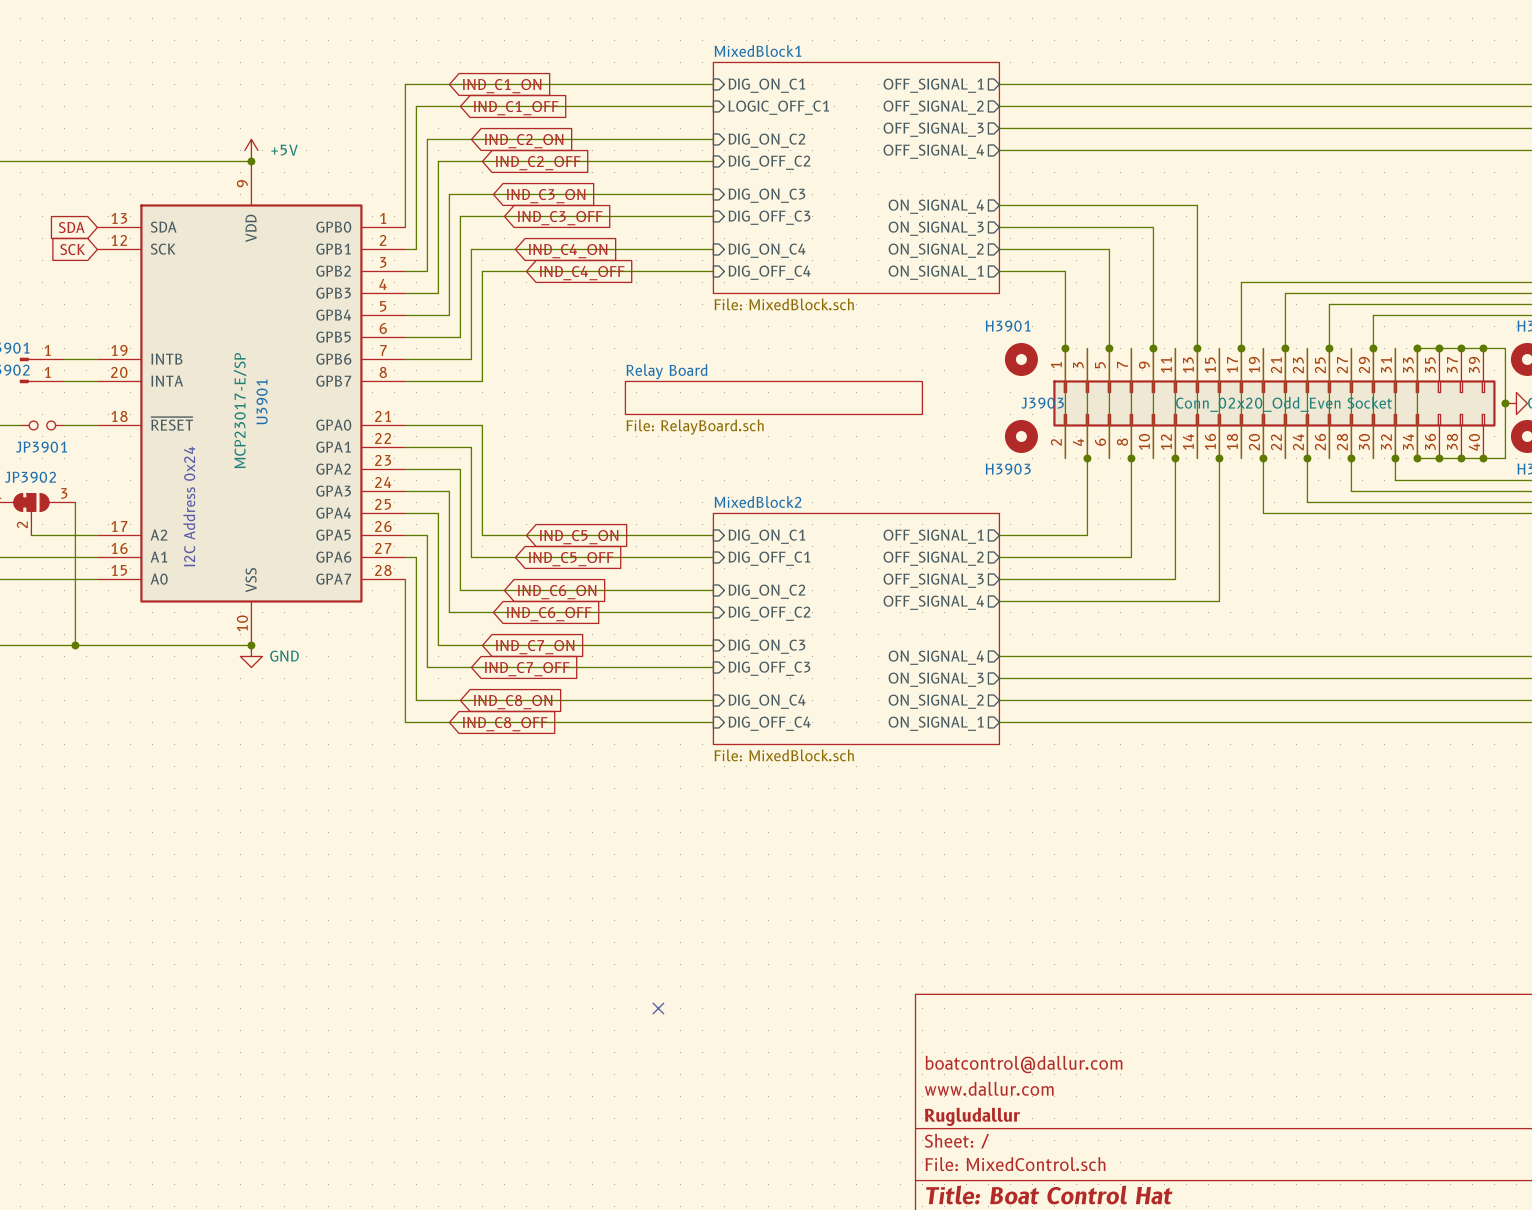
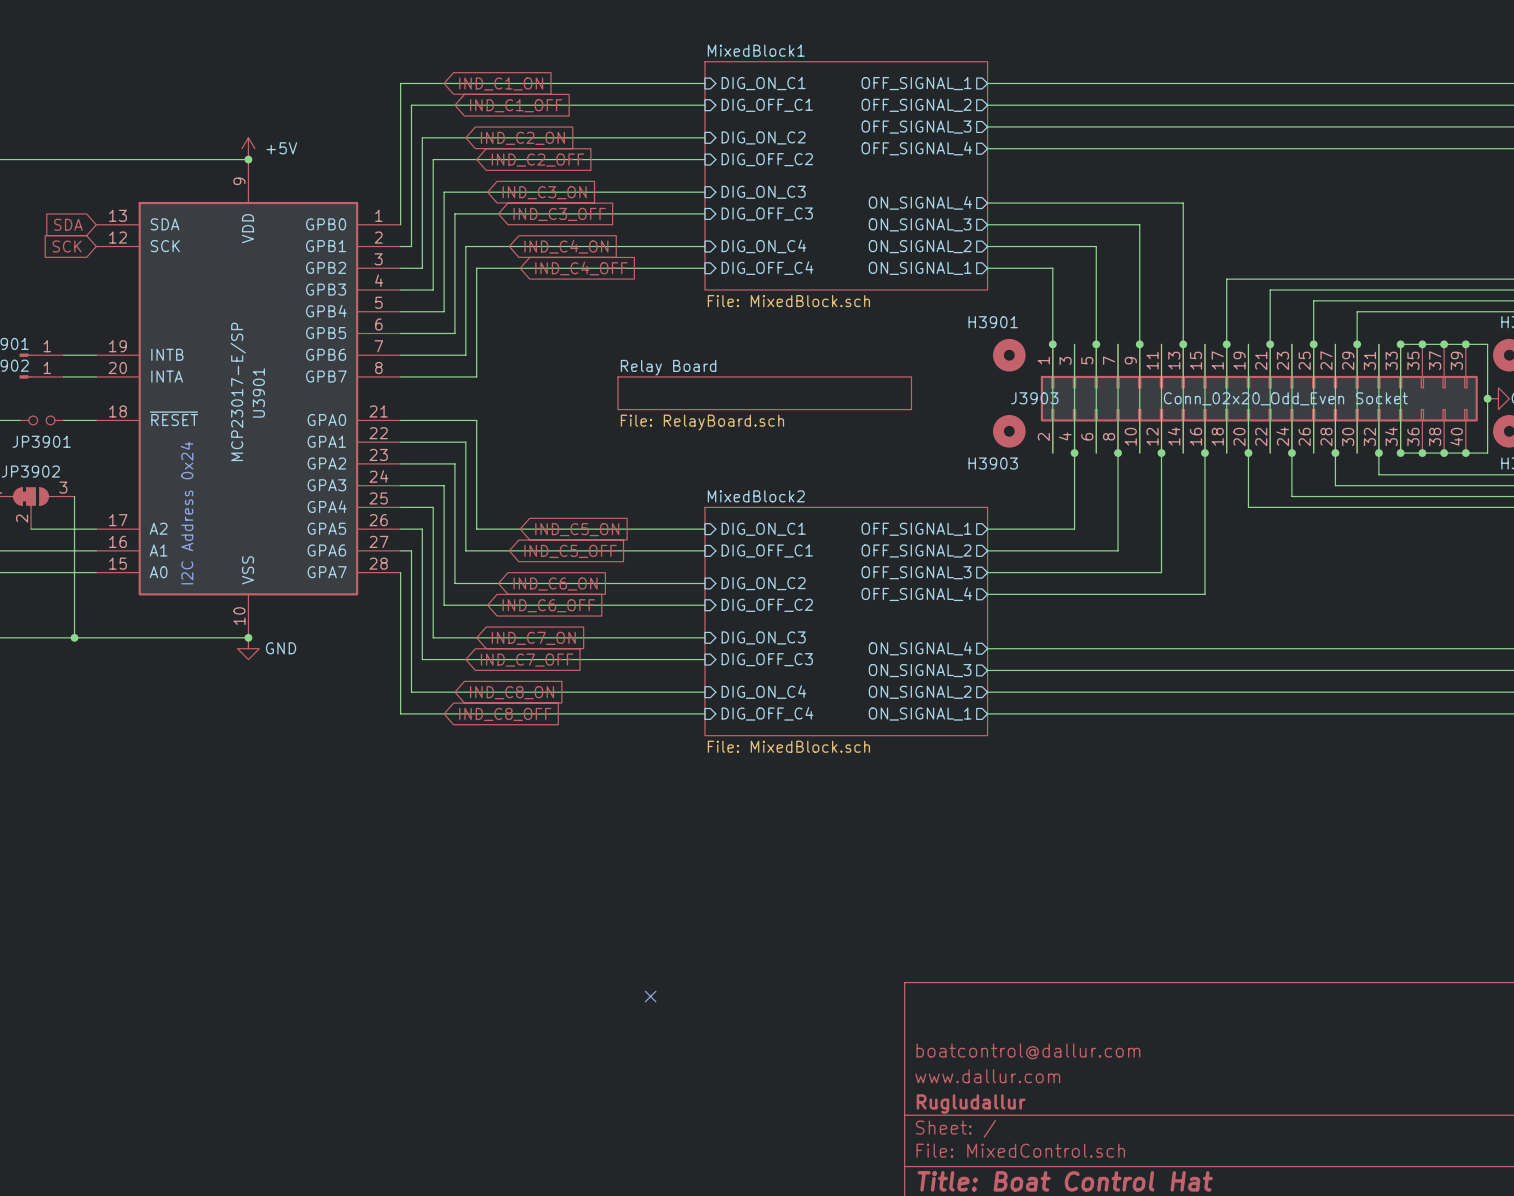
sheet pin: LOGIC_OFF_C1 (778, 107) -> DIG_OFF_C1 (767, 105)

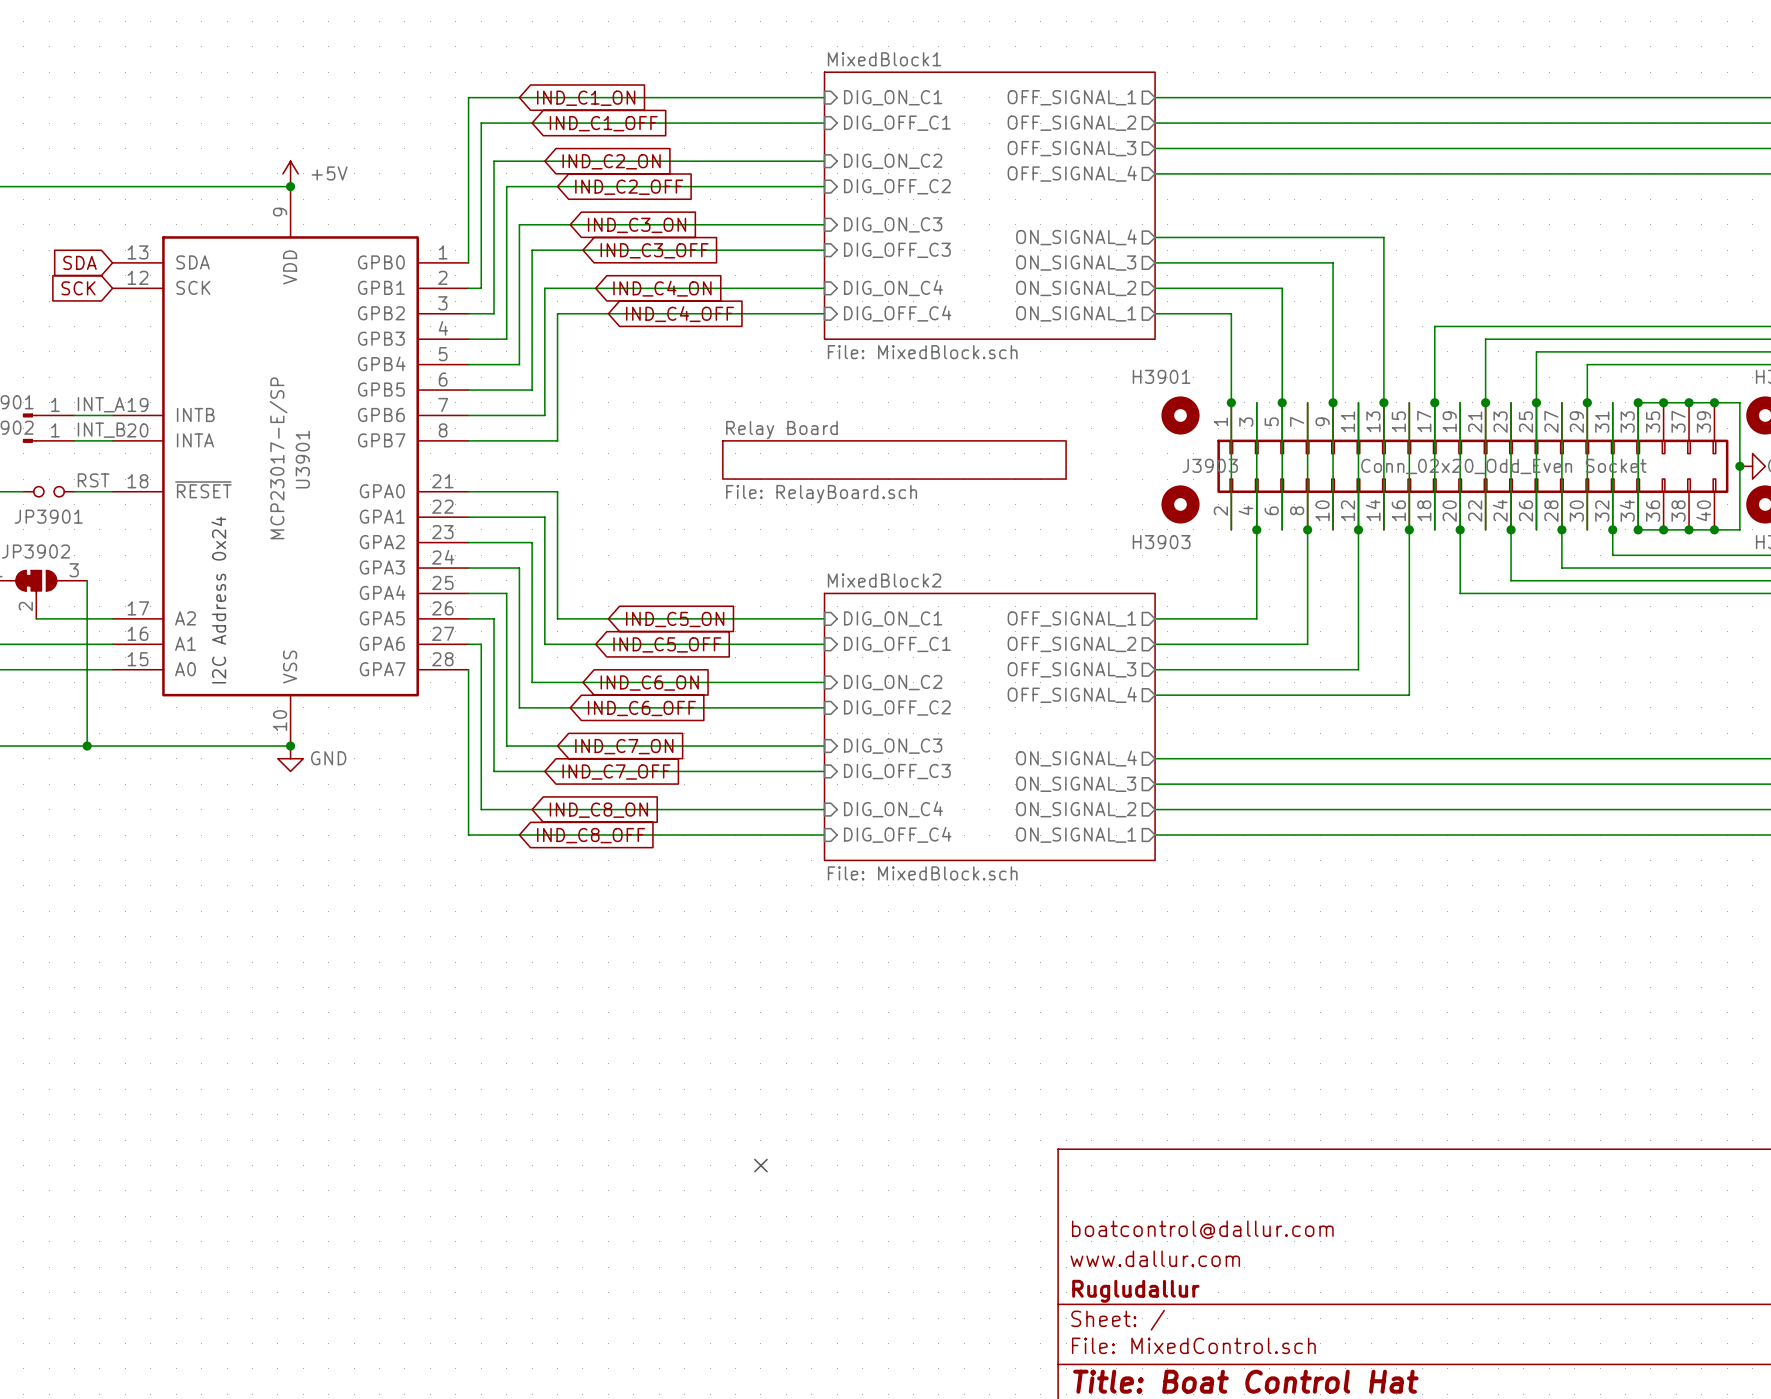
label: none -> INT_A (101, 404)
label: none -> INT_B (101, 430)
label: none -> RST (93, 480)

